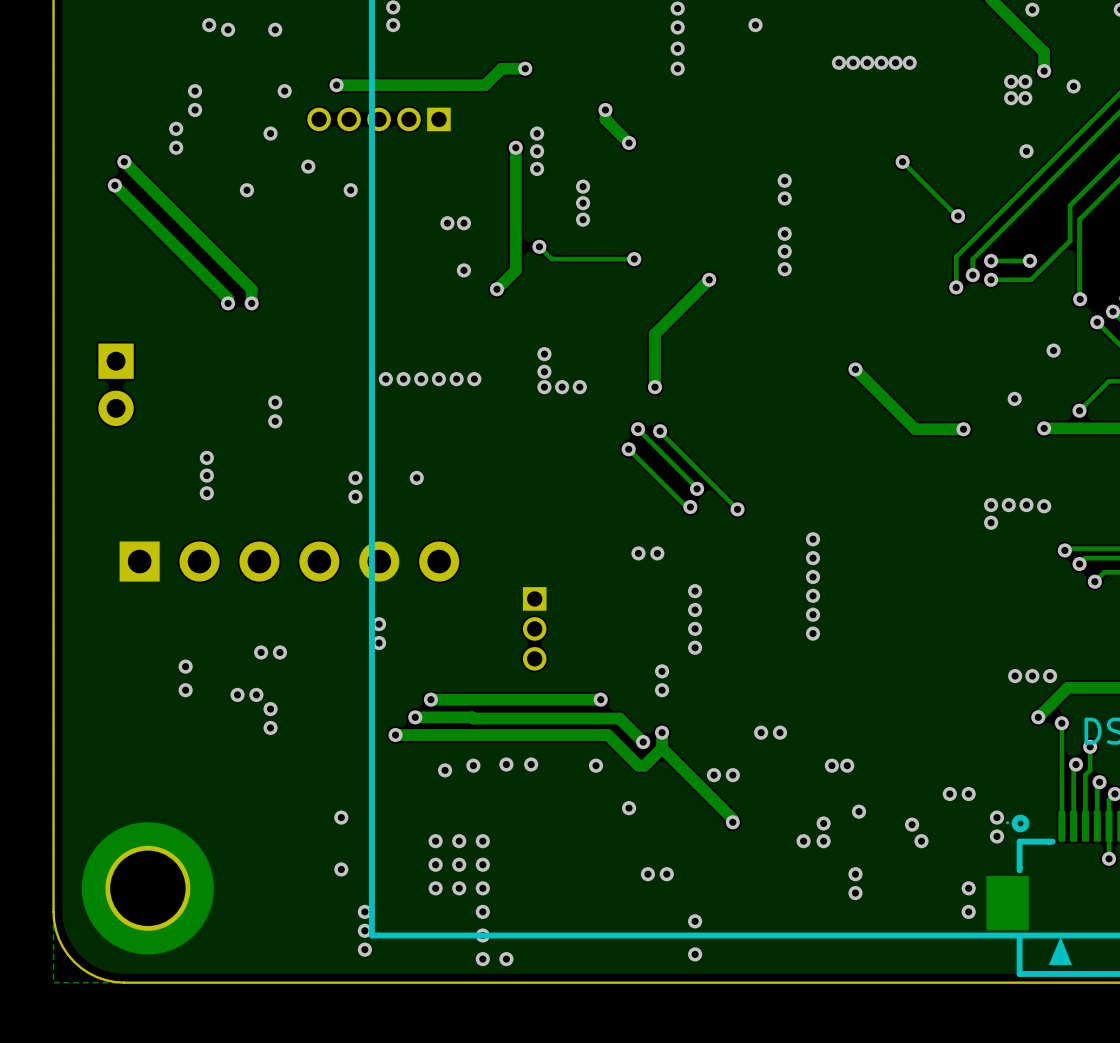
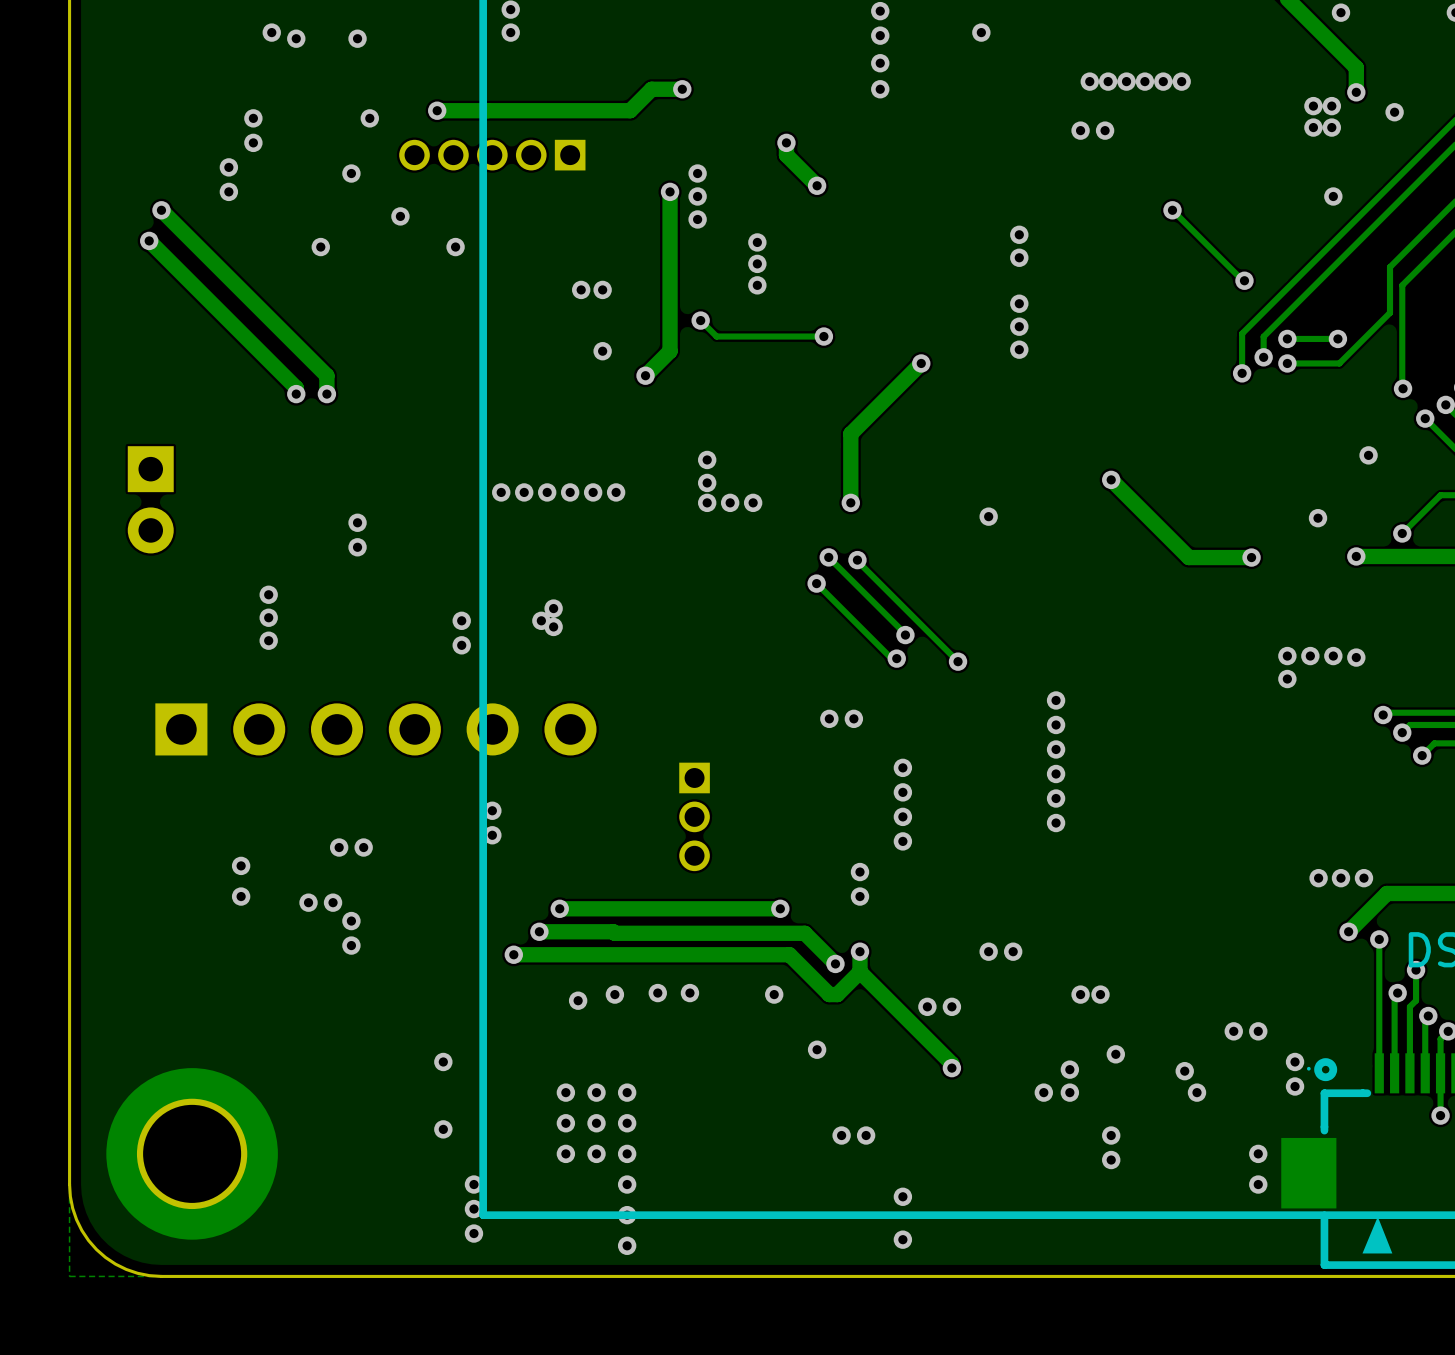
via: none -> (1080, 130)
via: none -> (1105, 130)
via: none -> (988, 516)
via: none -> (553, 608)
via: none -> (553, 626)
via: (506, 959) -> none

